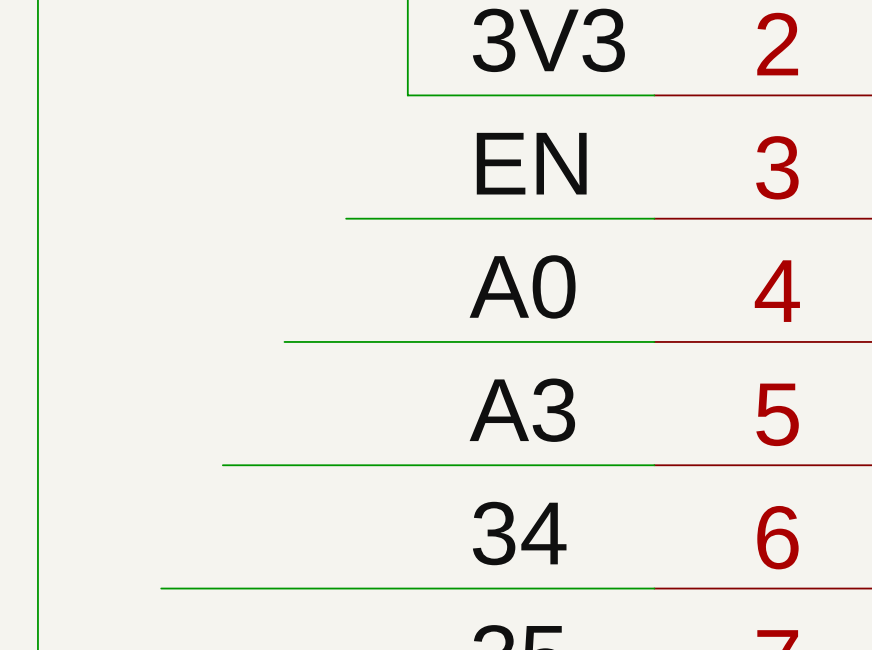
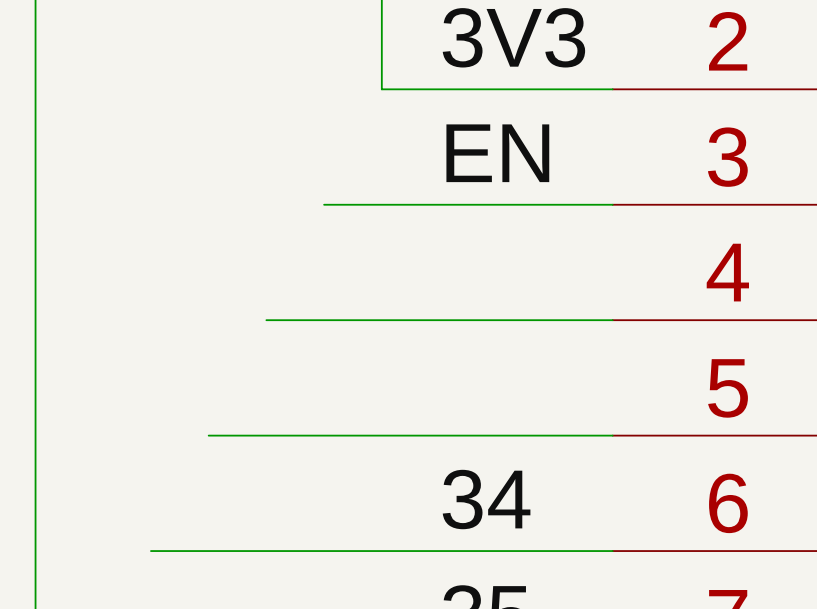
label: A0 (522, 286) -> none
label: A3 (522, 410) -> none

